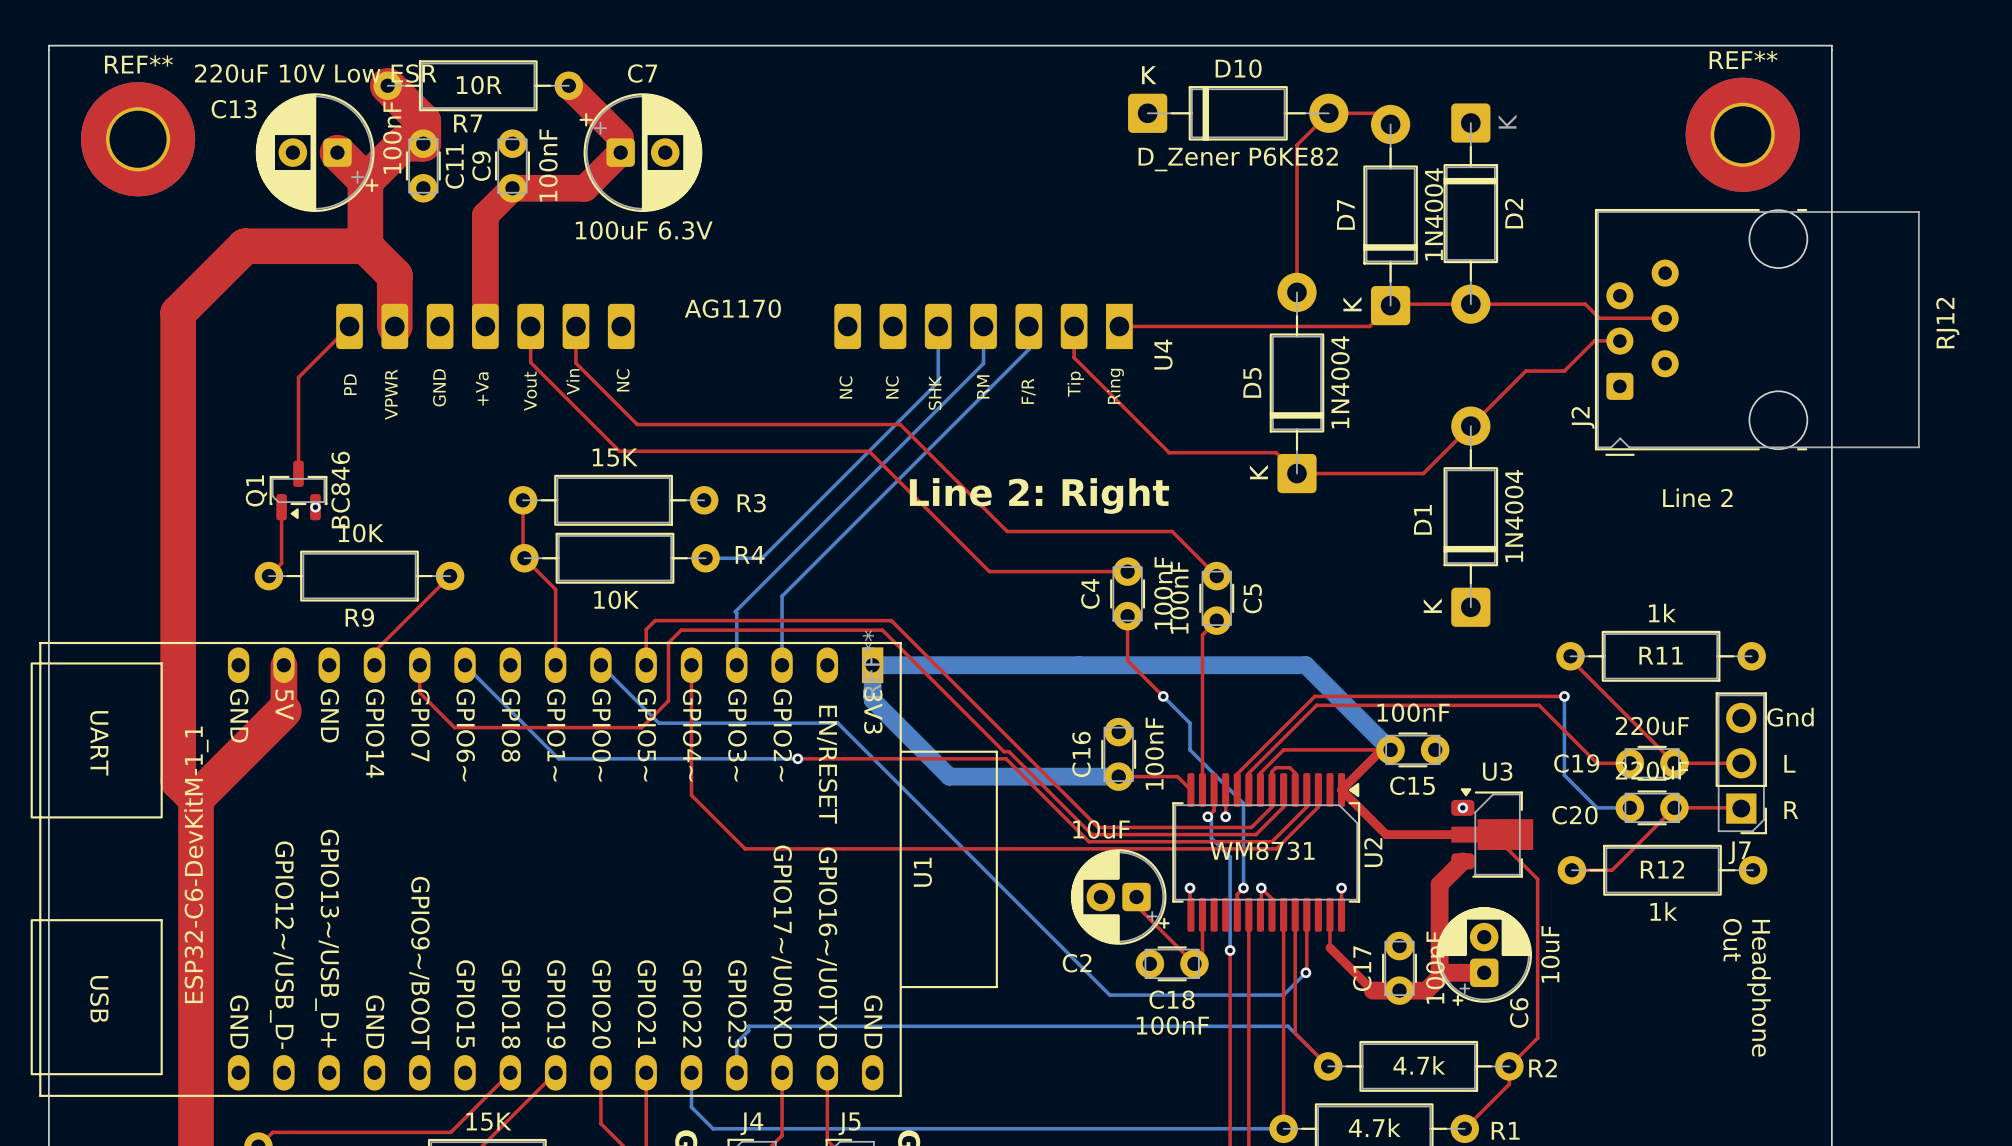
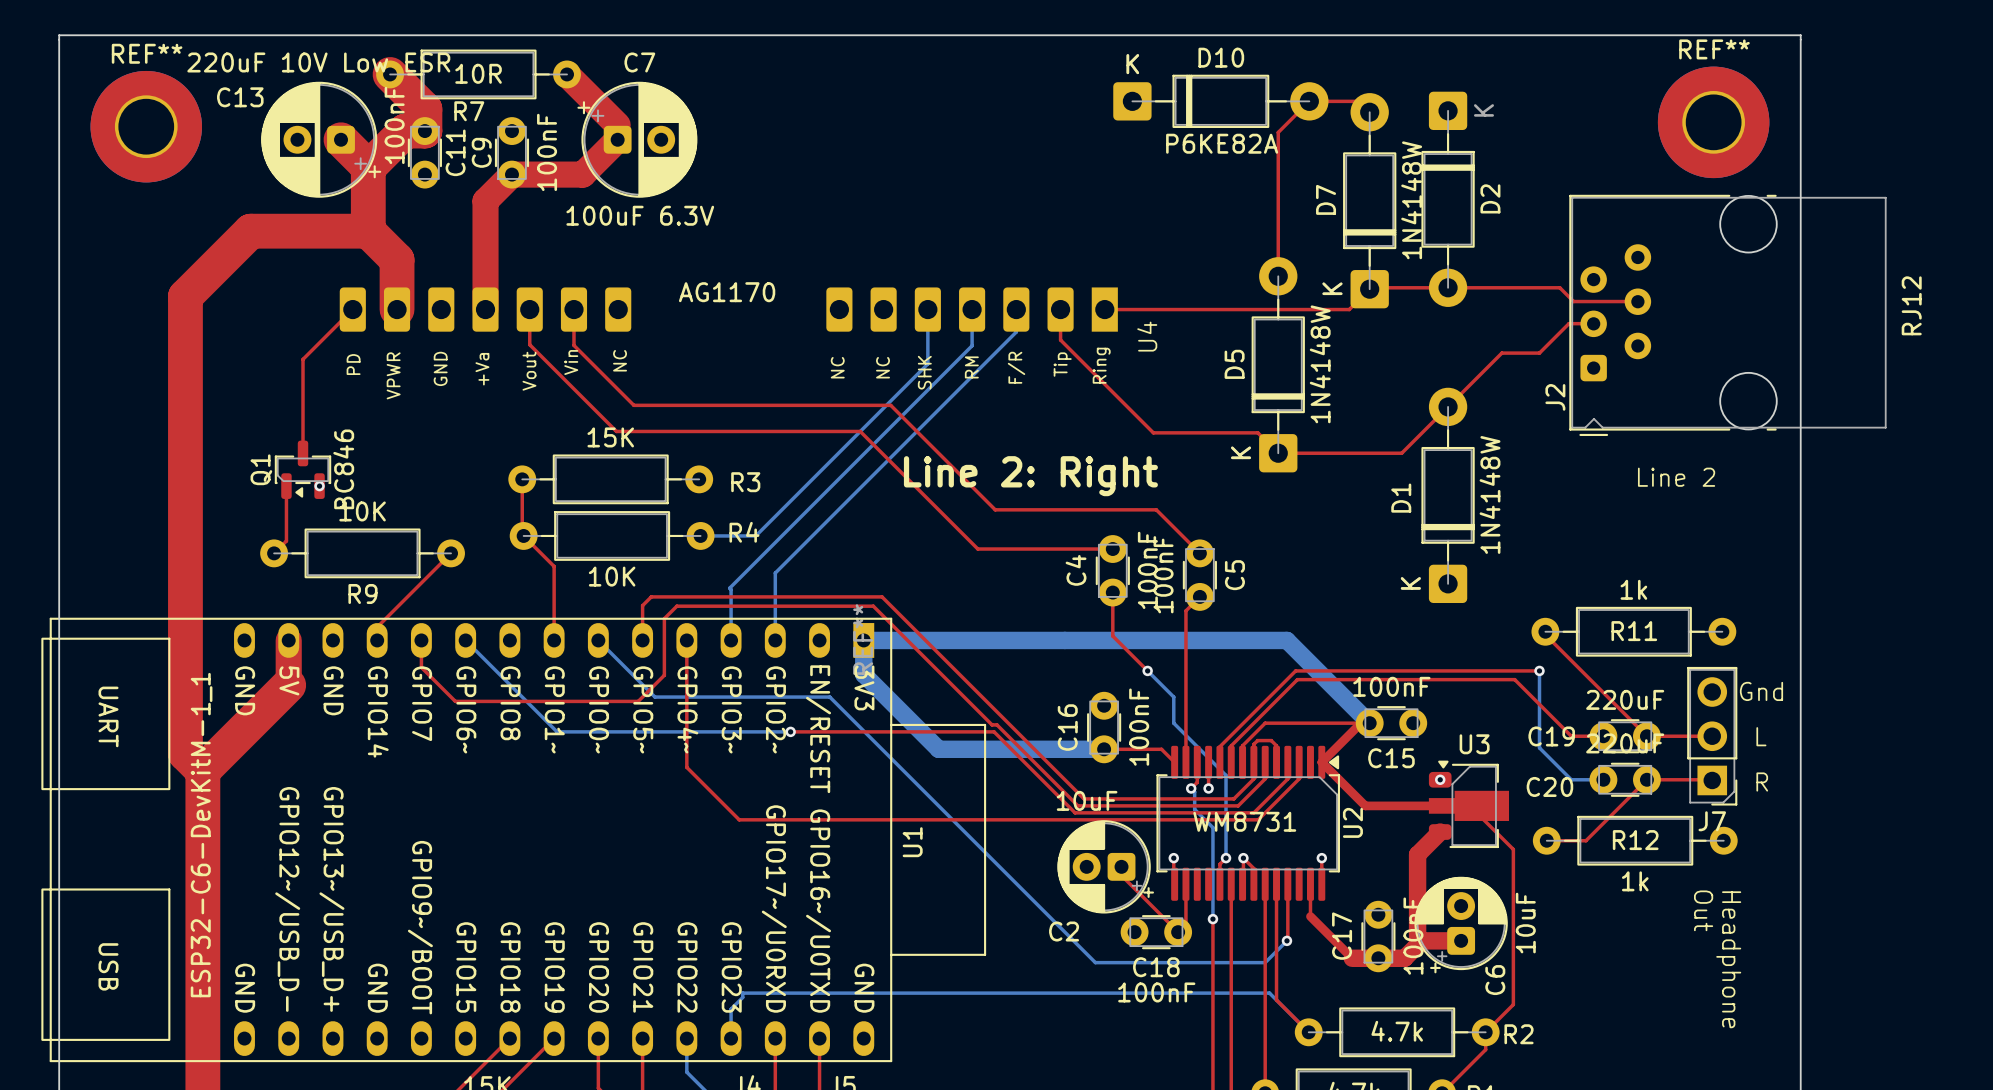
D10 value: D_Zener P6KE82 (1238, 159) -> P6KE82A (1222, 143)
D7 value: 1N4004 (1433, 214) -> 1N4148W (1411, 200)
D5 value: 1N4004 (1340, 382) -> 1N4148W (1320, 364)
D1 value: 1N4004 (1514, 516) -> 1N4148W (1490, 494)

